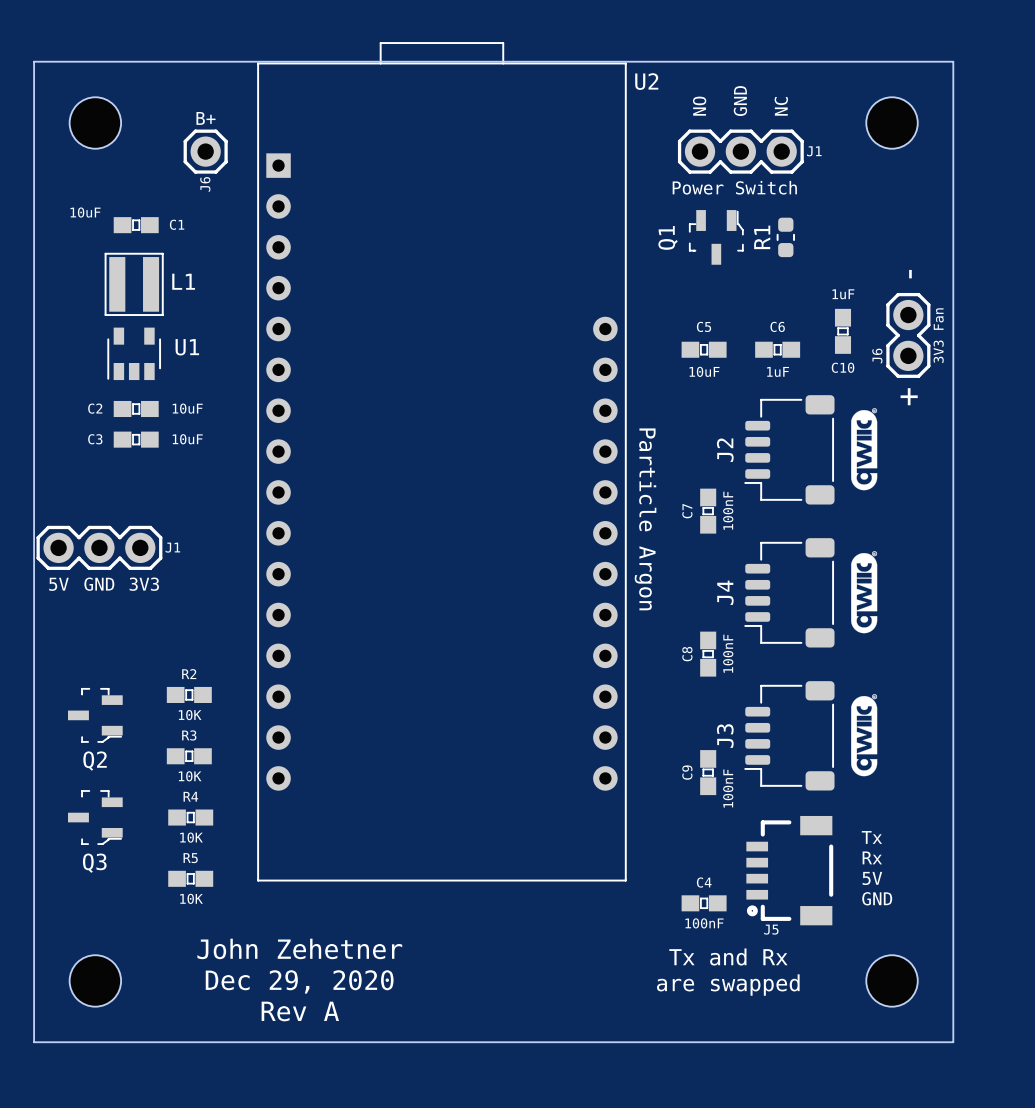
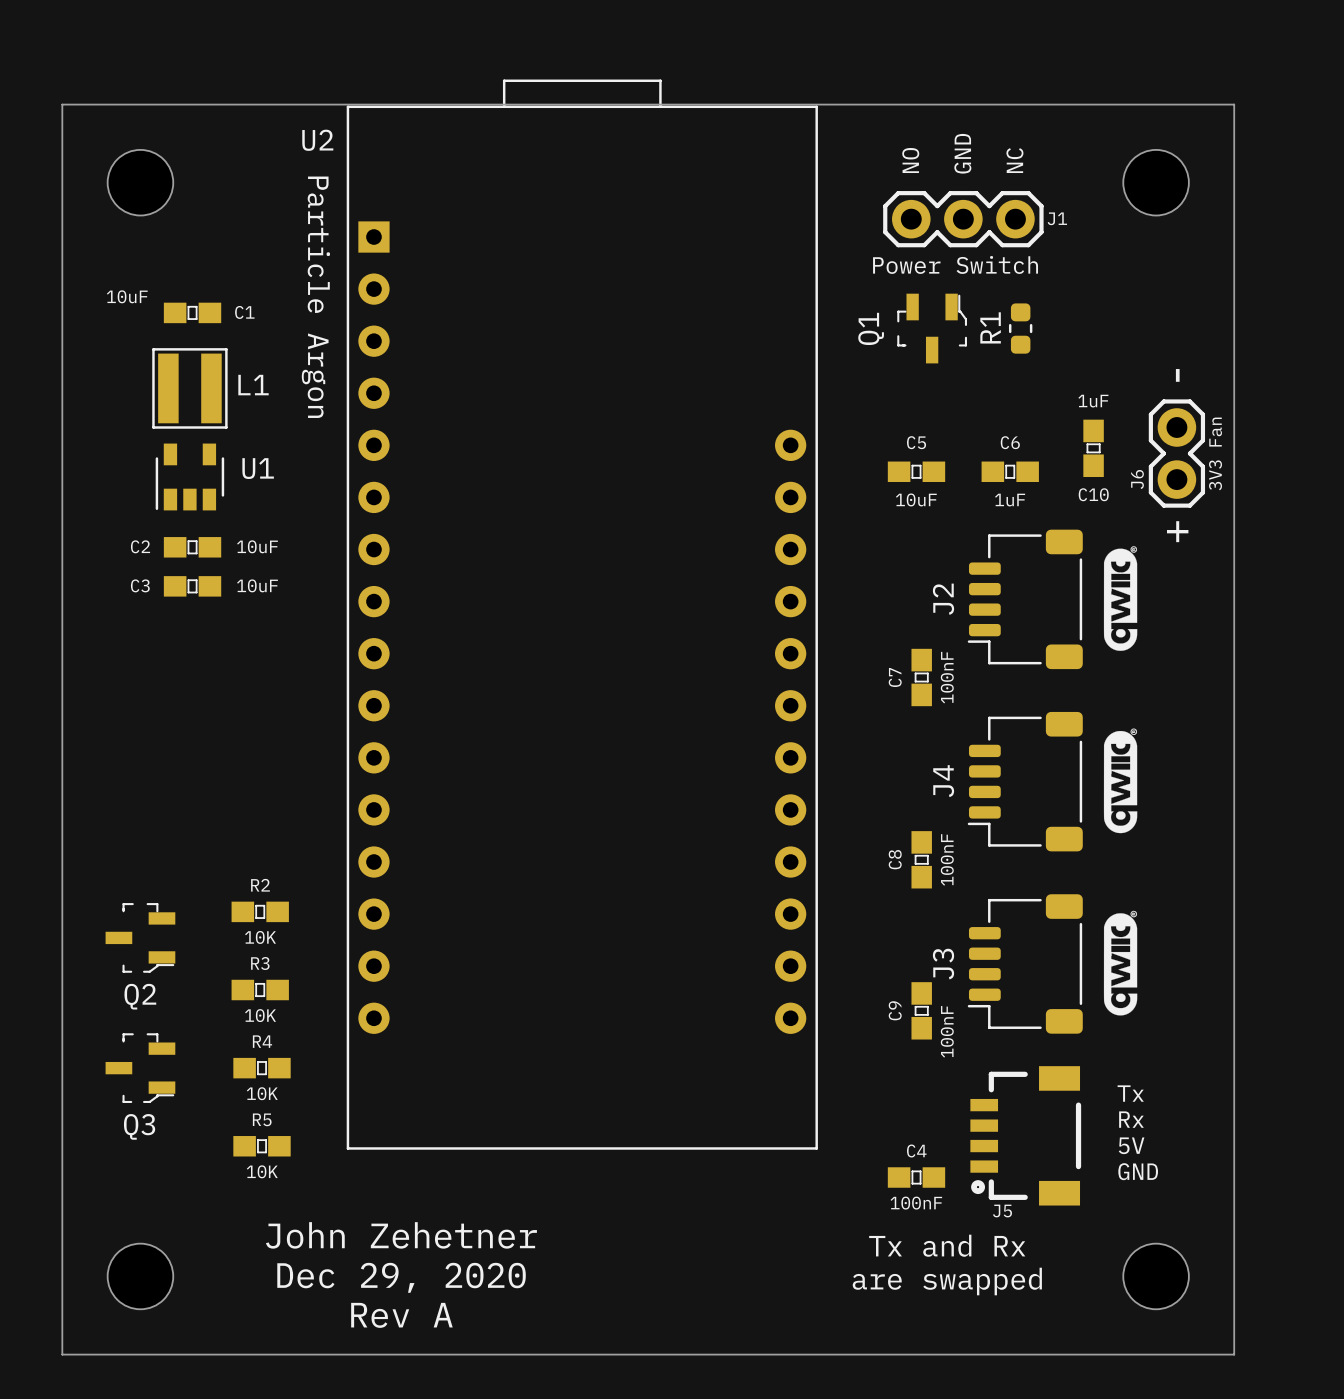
U2 name position: U2 (646, 81) -> U2 (317, 140)
text: B+ (206, 118) -> none
J6: (205, 151) -> none
text: none -> Particle Argon (315, 297)
text: Particle Argon (645, 519) -> none
J1: (99, 547) -> none
text: 5V (58, 584) -> none
text: GND (99, 584) -> none
text: 3V3 (144, 584) -> none

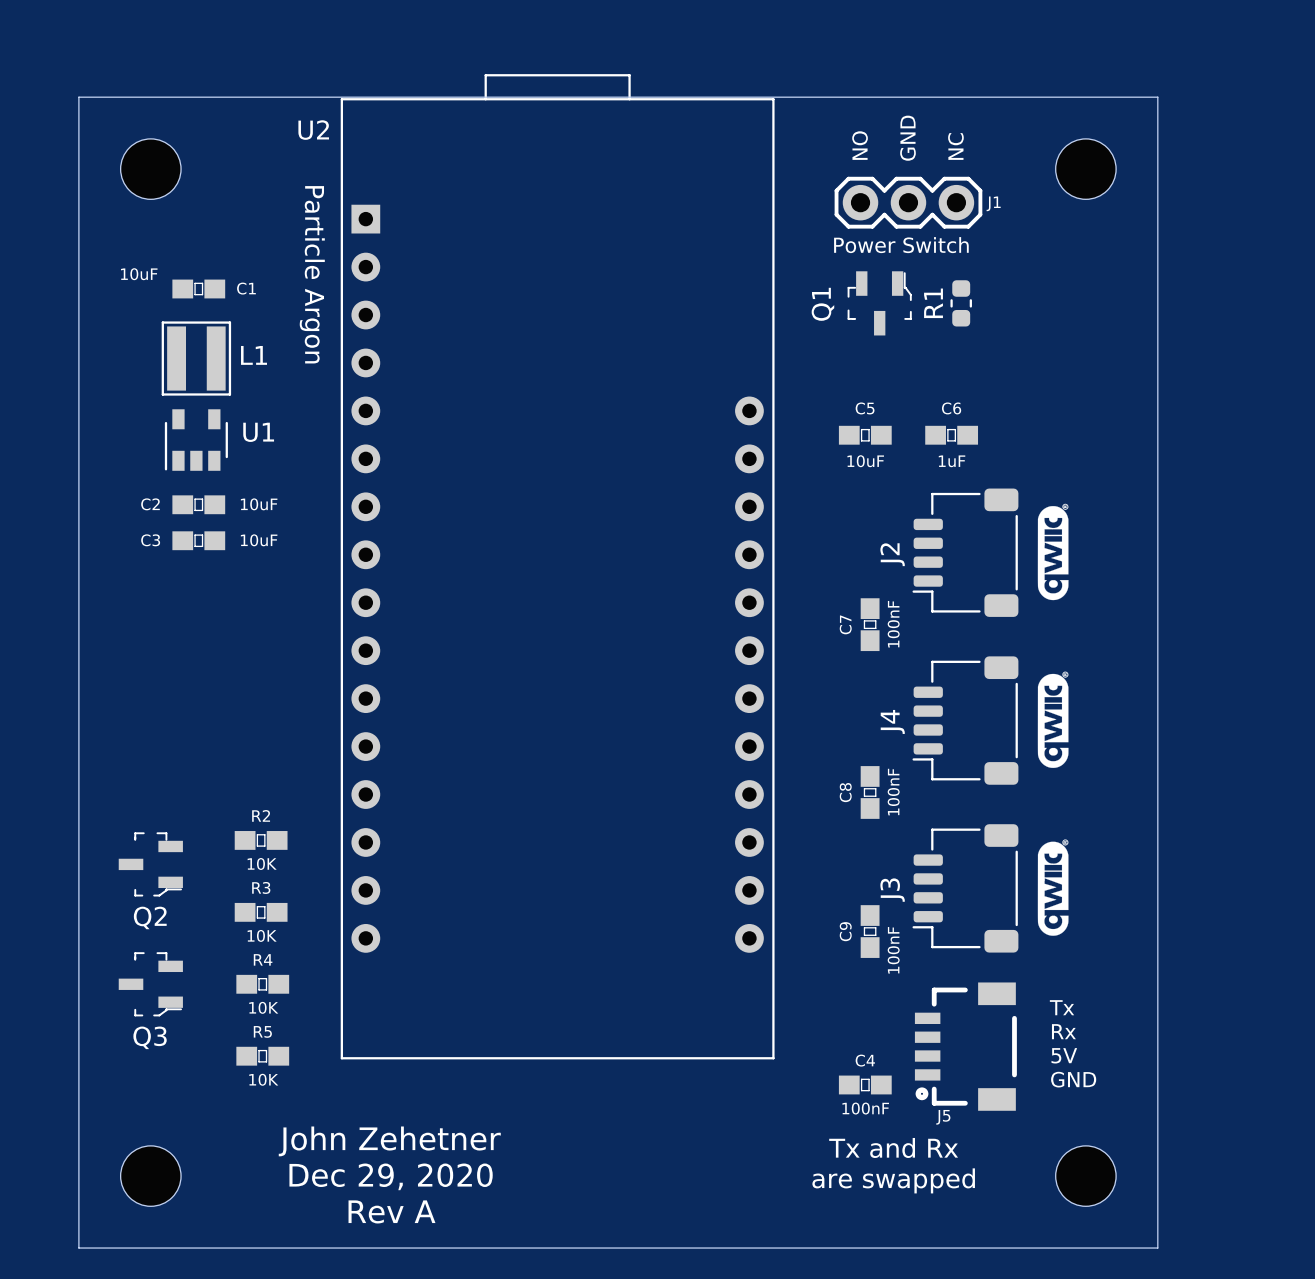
text: - (1177, 375) -> none
C10: 1uF (1093, 448) -> none
J6: 3V3 Fan (1176, 453) -> none
text: + (1177, 531) -> none

